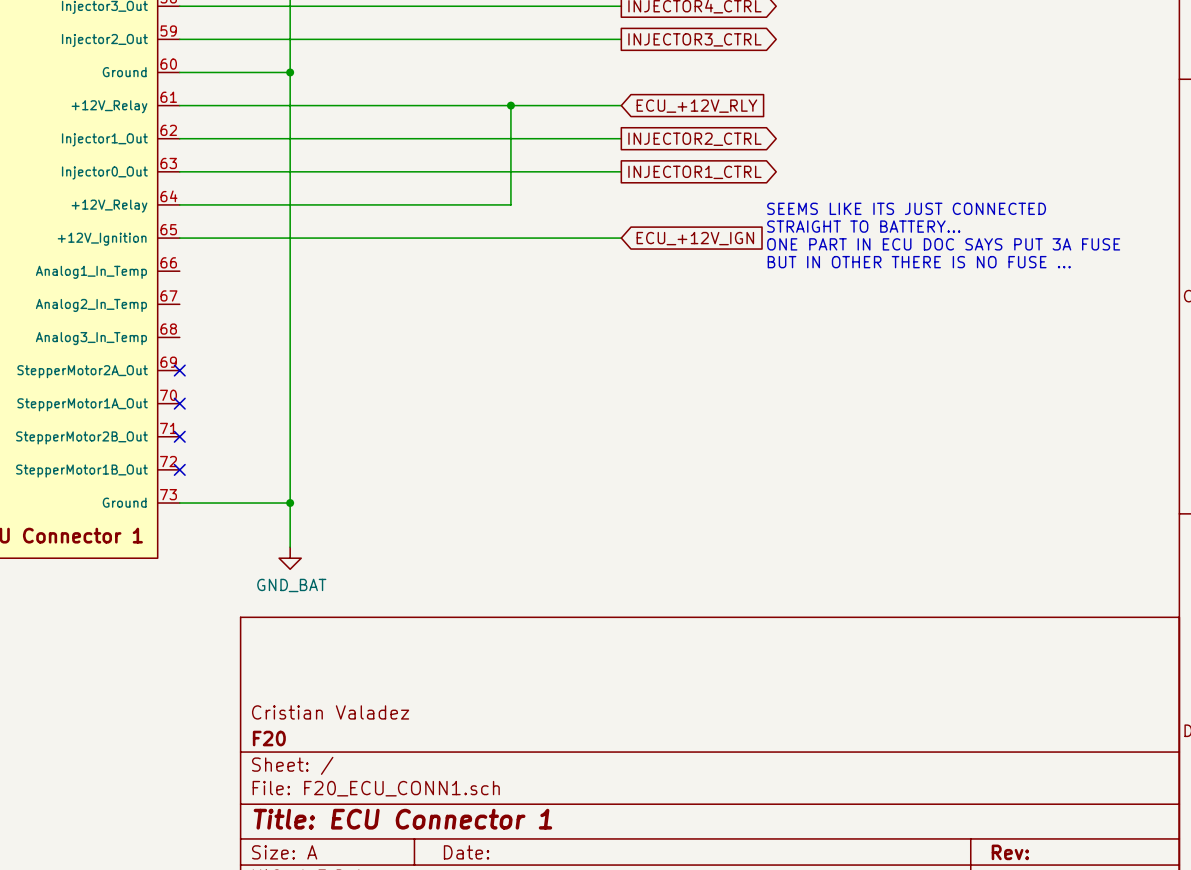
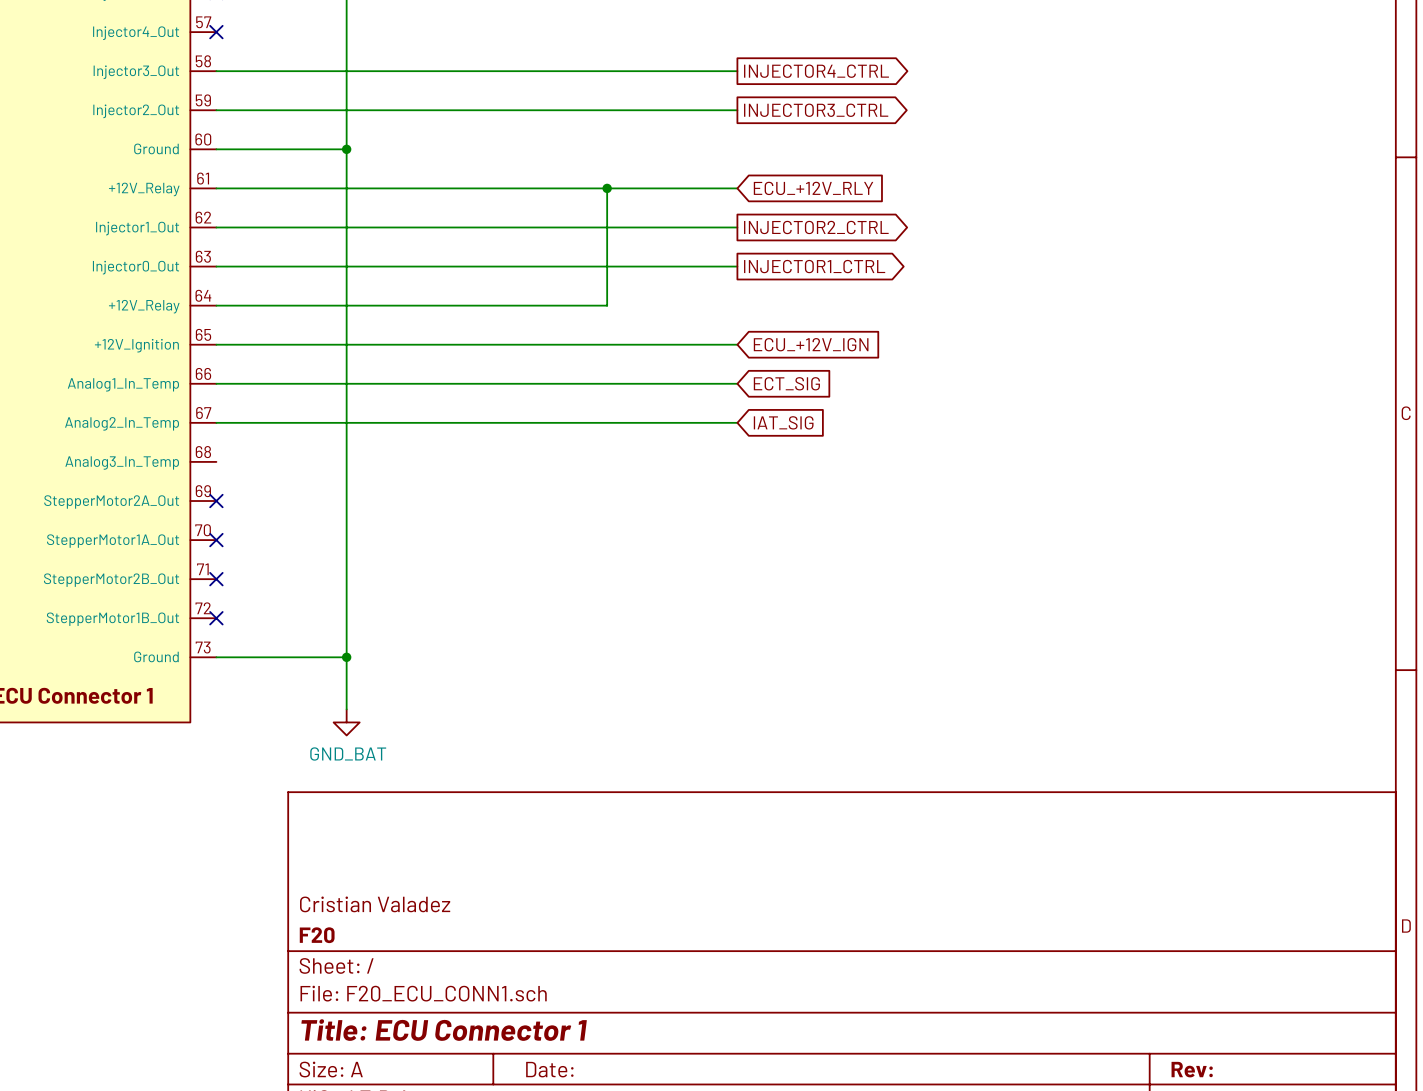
text: SEEMS LIKE ITS JUST CONNECTED (906, 208) -> none
text: STRAIGHT TO BATTERY... (863, 226) -> none
text: ONE PART IN ECU DOC SAYS PUT 3A FUSE (943, 244) -> none
text: BUT IN OTHER THERE IS NO FUSE ... (919, 262) -> none
wire: none -> (216, 383) (737, 383)
global label: none -> ECT_SIG (786, 383)
wire: none -> (216, 422) (737, 422)
global label: none -> IAT_SIG (783, 422)

